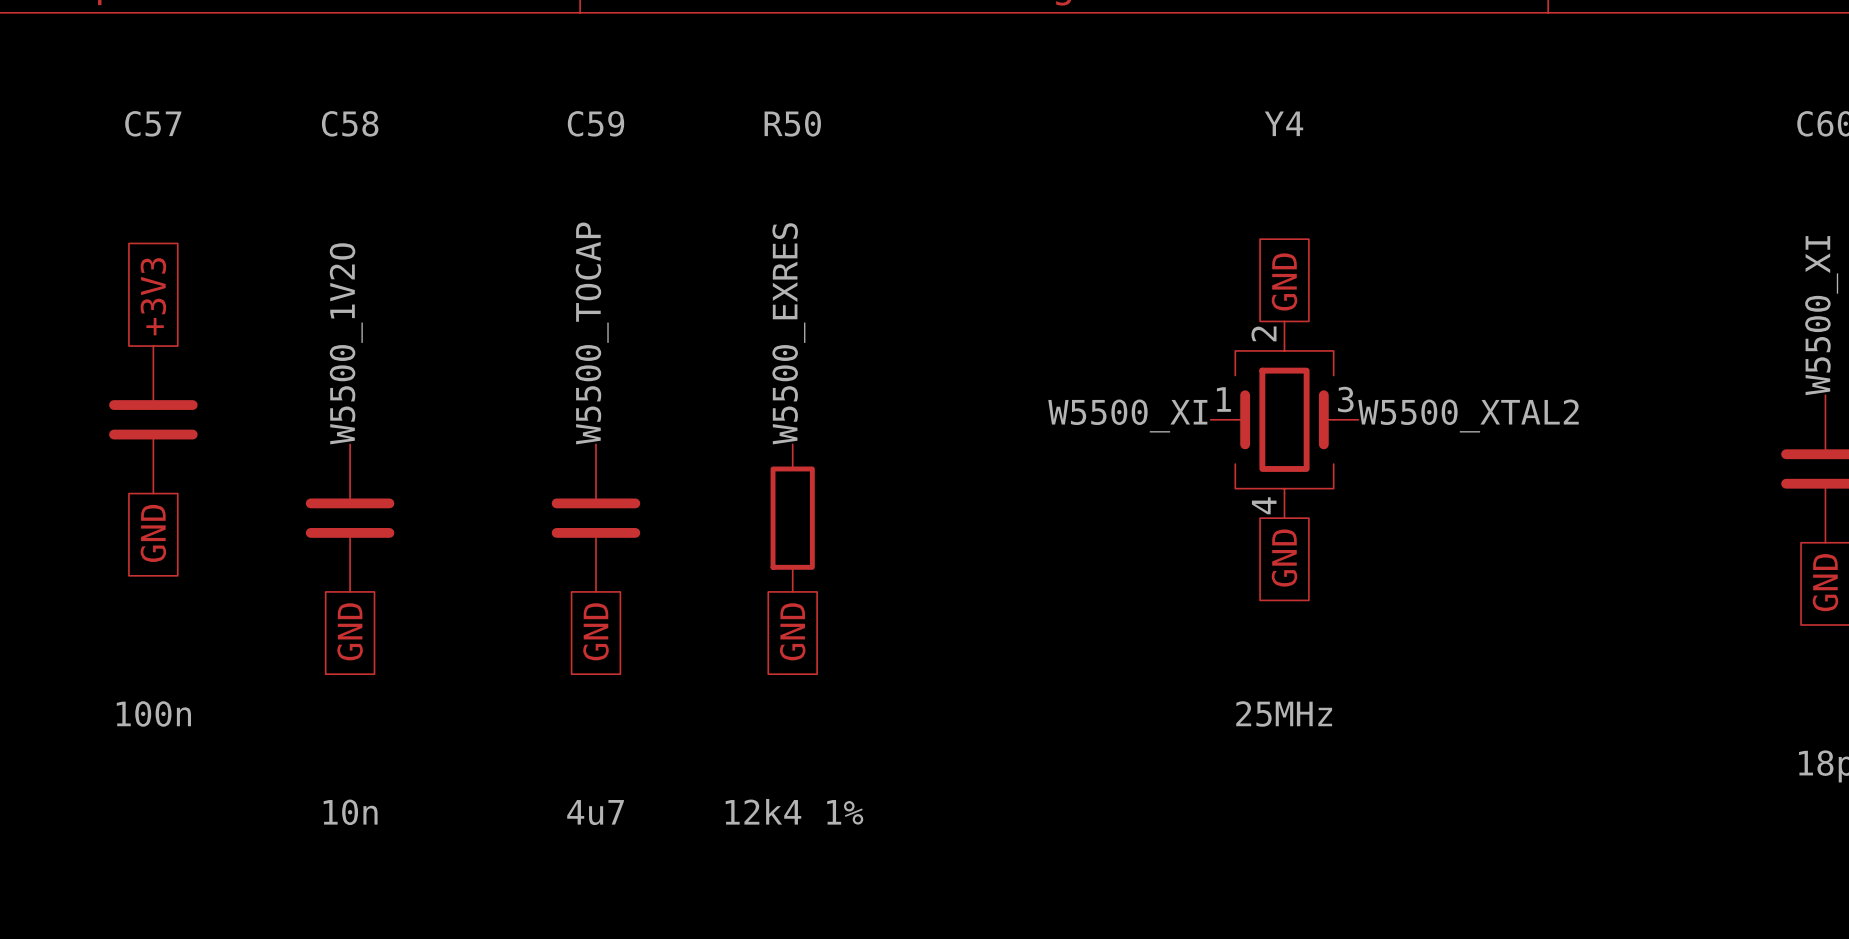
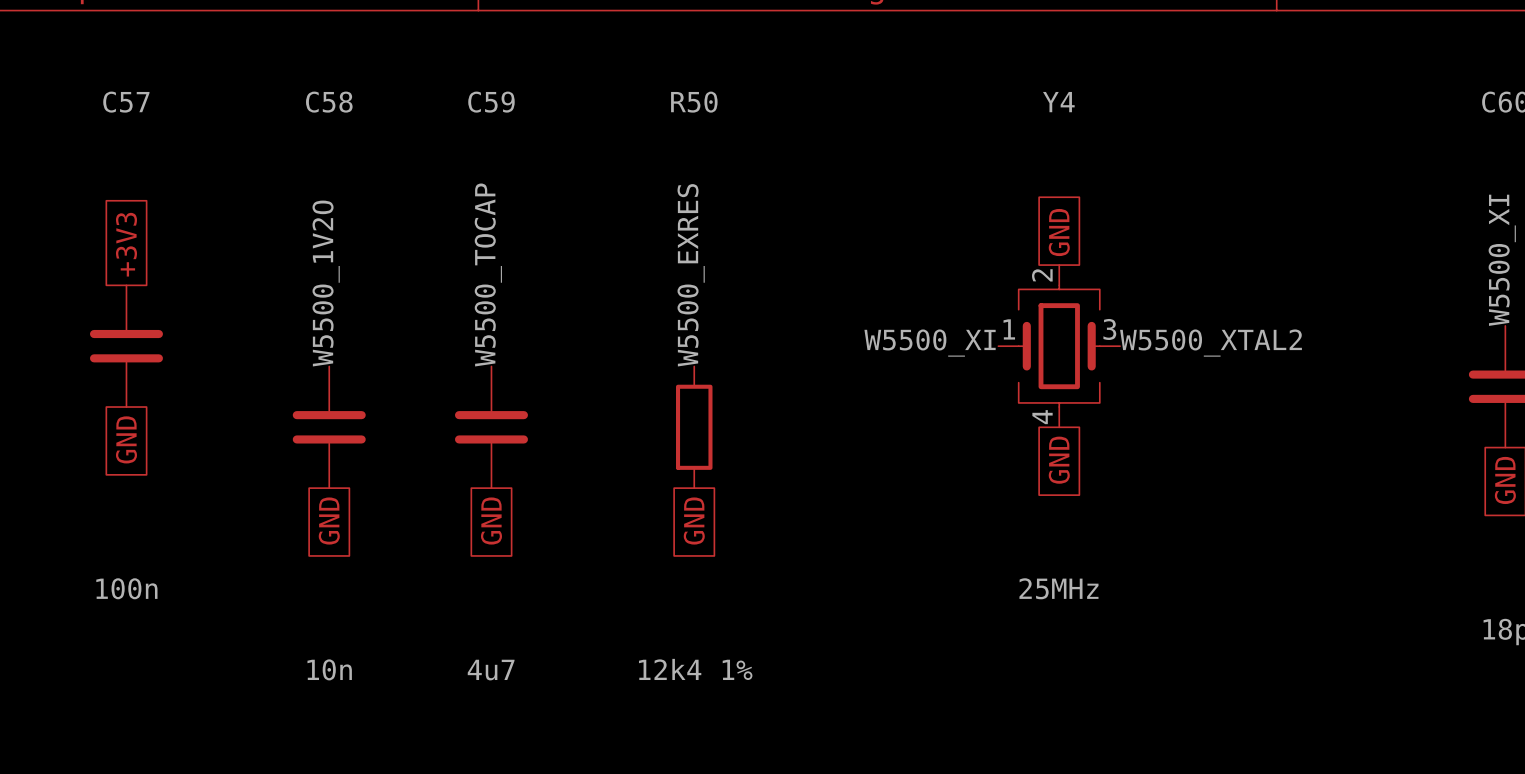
label position: W5500_EXRES (788, 333) -> W5500_EXRES (691, 275)
label position: W5500_1V2O (346, 343) -> W5500_1V2O (326, 283)
C58 position: (350, 518) -> (329, 427)
R50 position: (792, 518) -> (694, 427)
global label position: GND (350, 631) -> GND (329, 521)
global label position: GND (792, 631) -> GND (694, 521)

